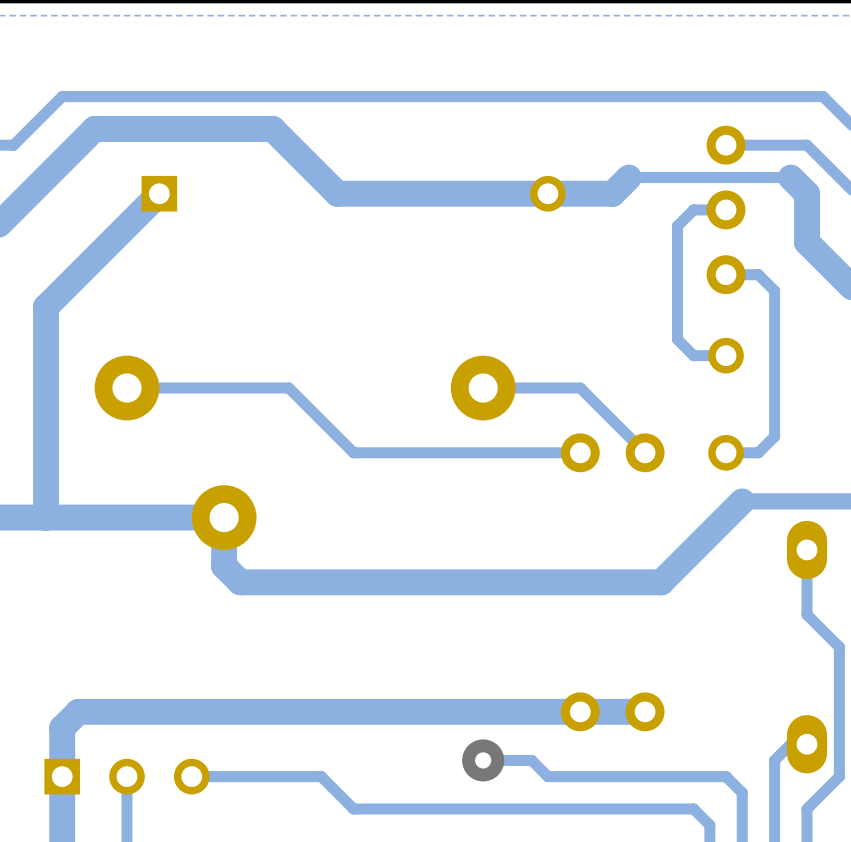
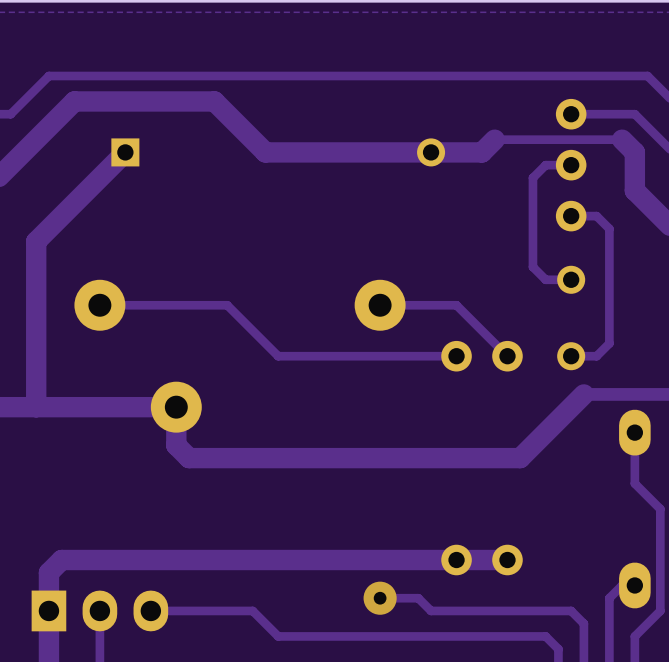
part footprint: [44, 758, 210, 795] -> [31, 590, 169, 632]

